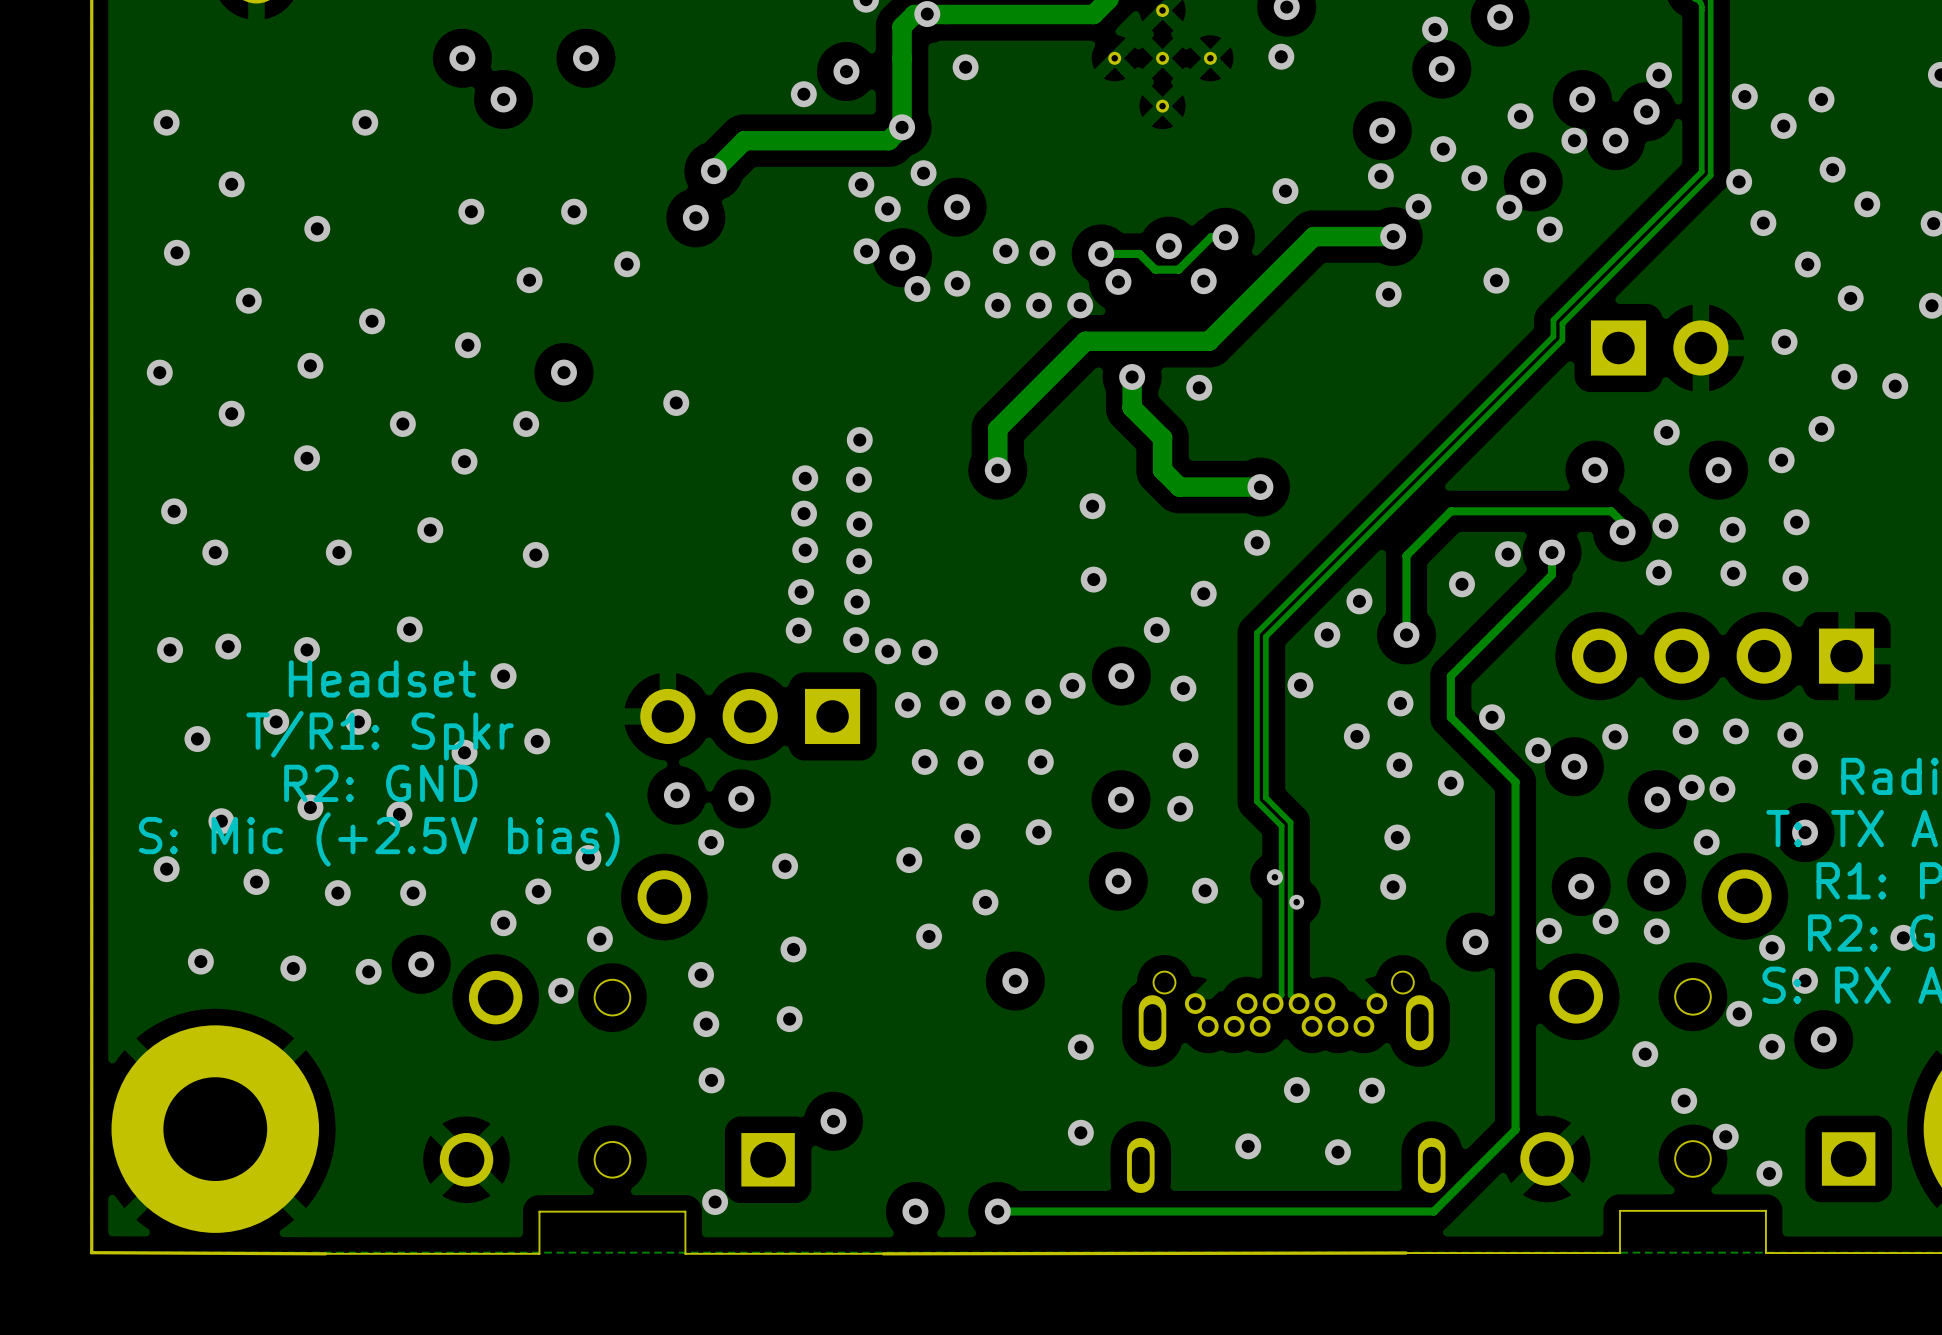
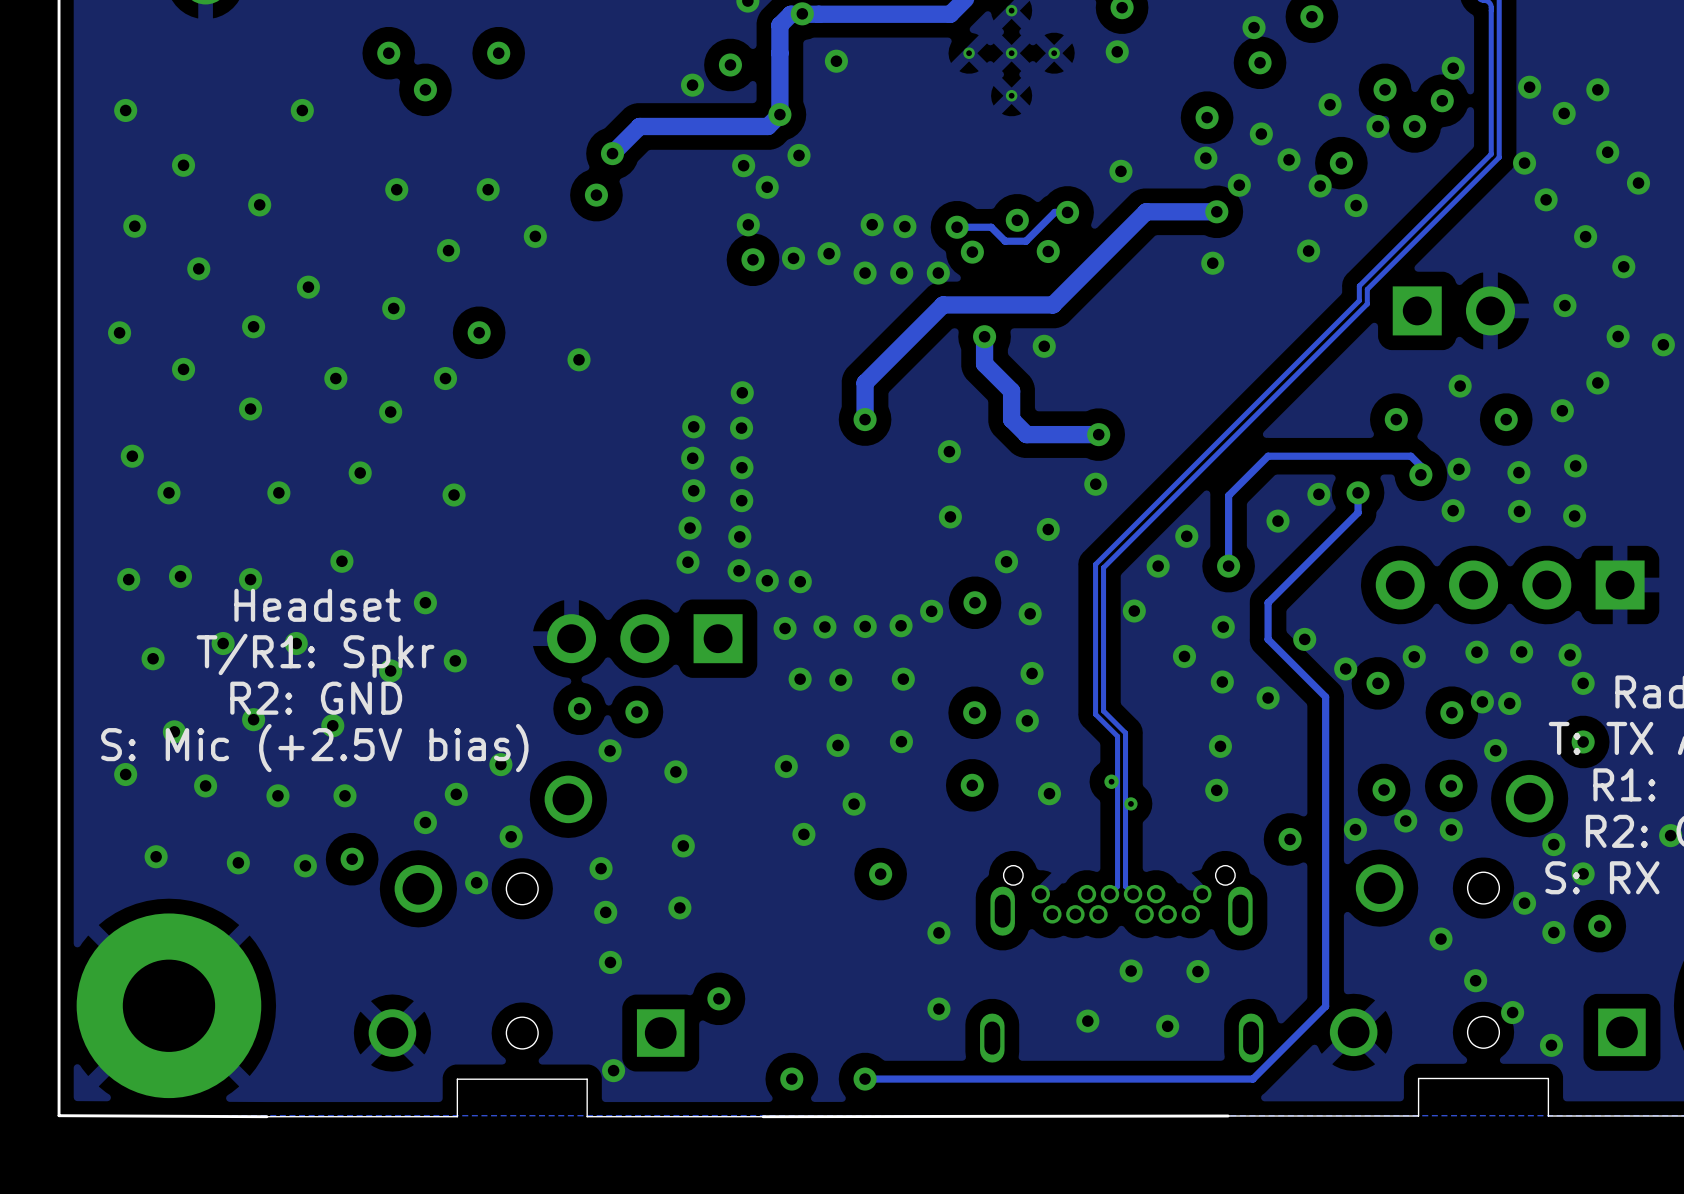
via: (957, 207) -> none
via position: (902, 257) -> (752, 259)

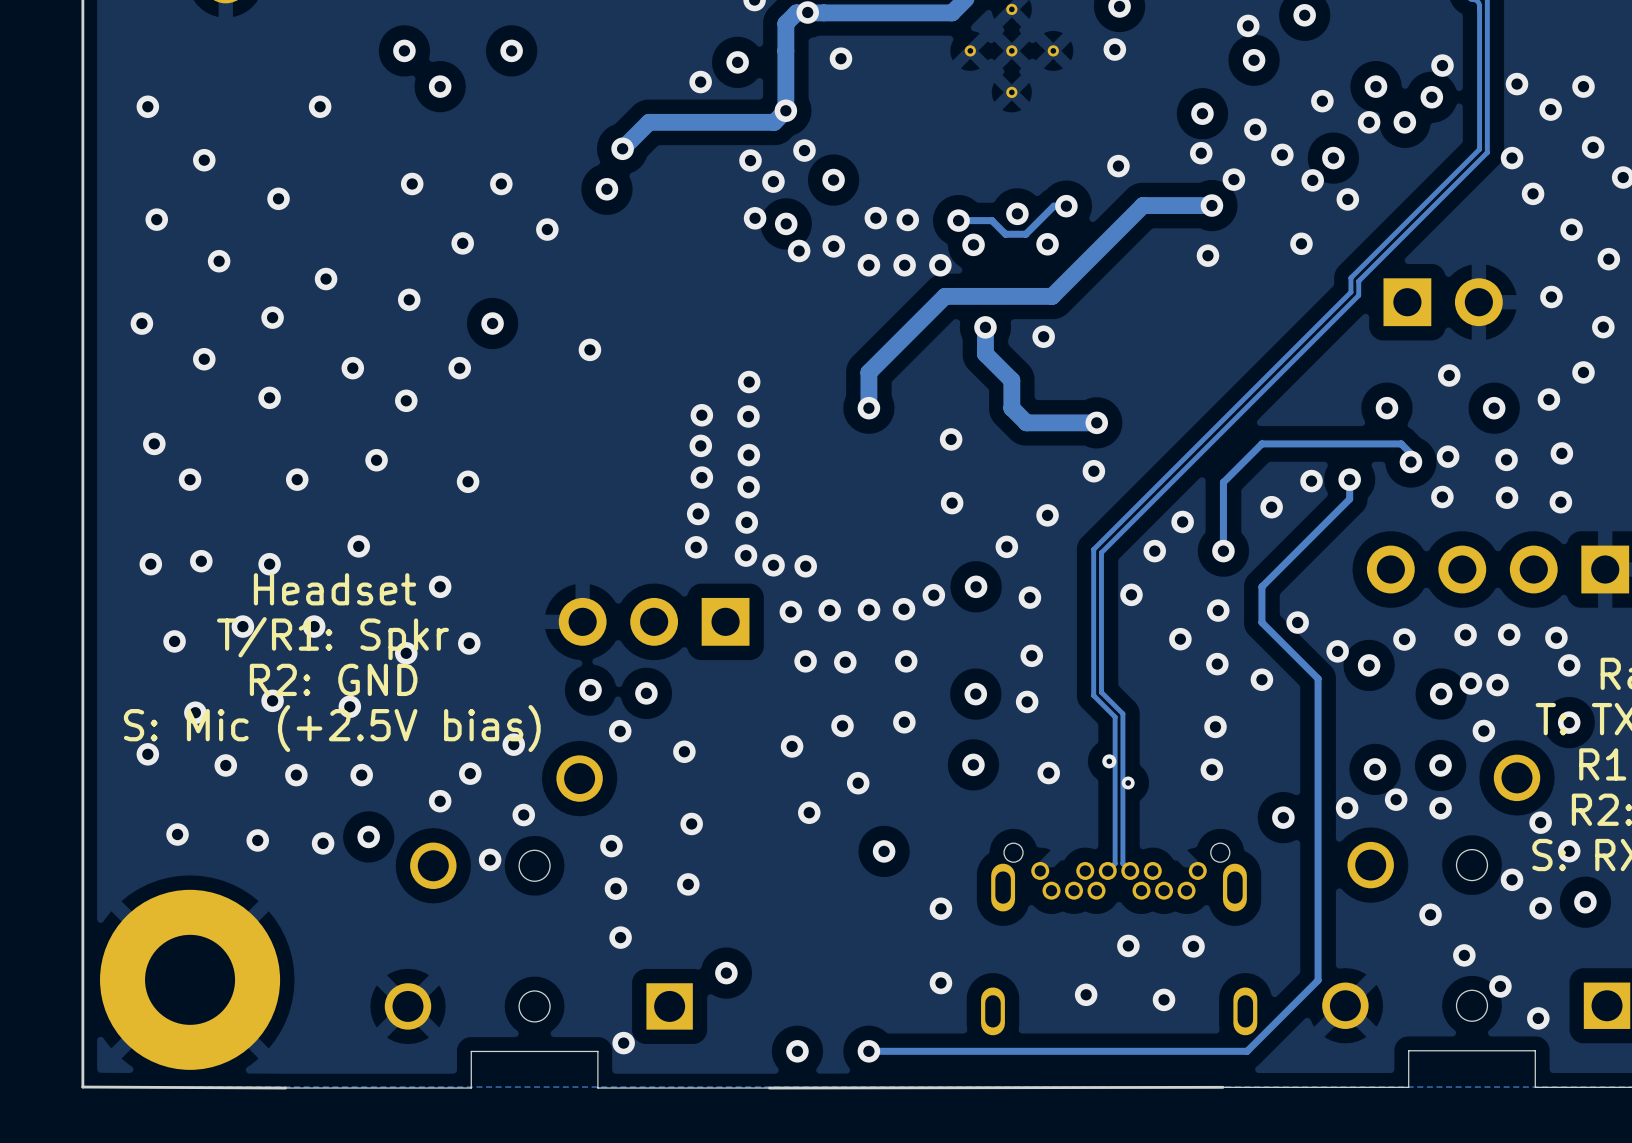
via: none -> (833, 180)
via position: (752, 259) -> (786, 223)

